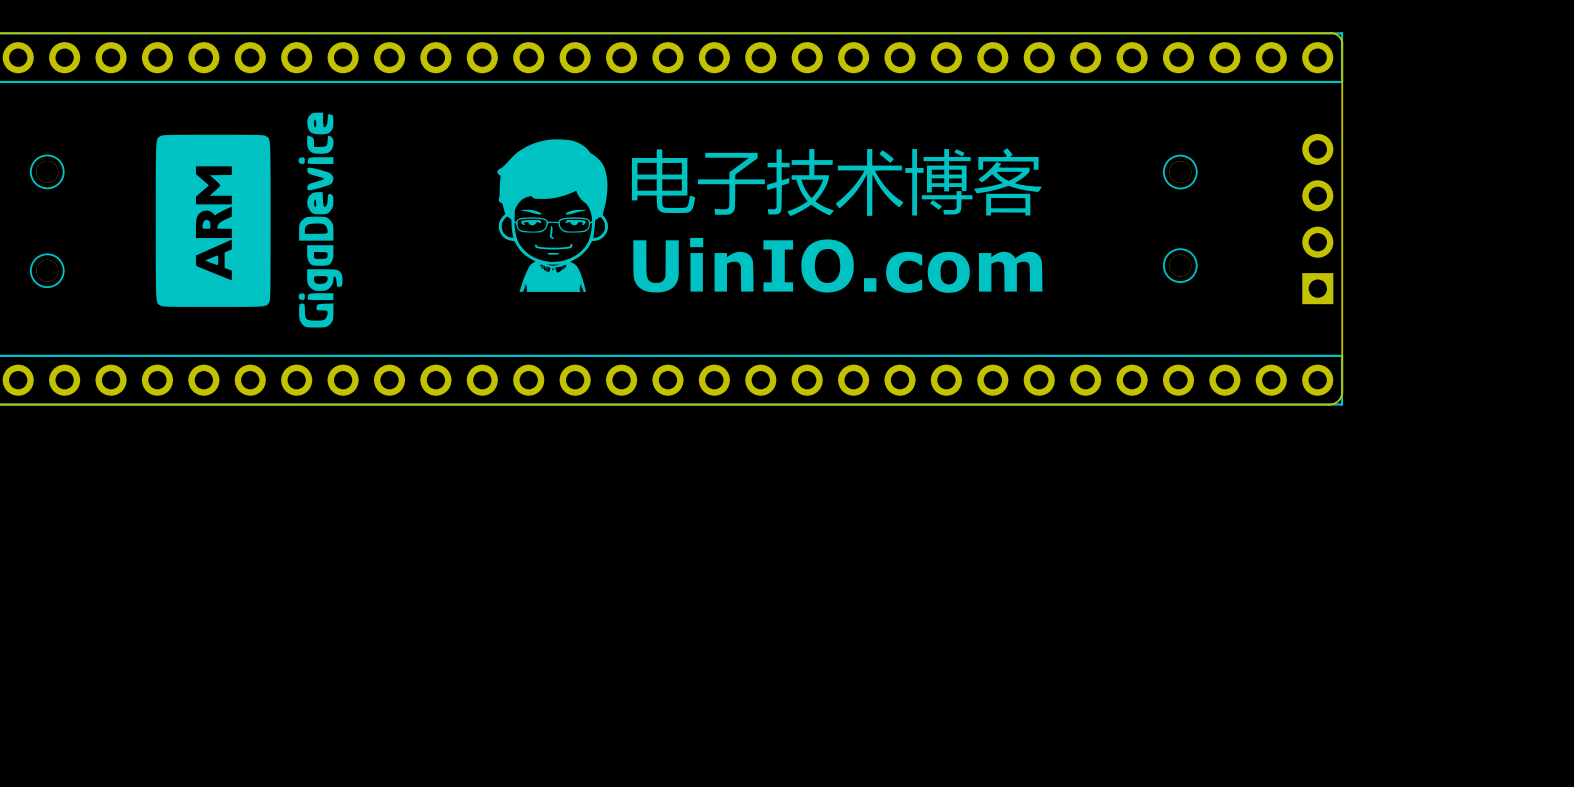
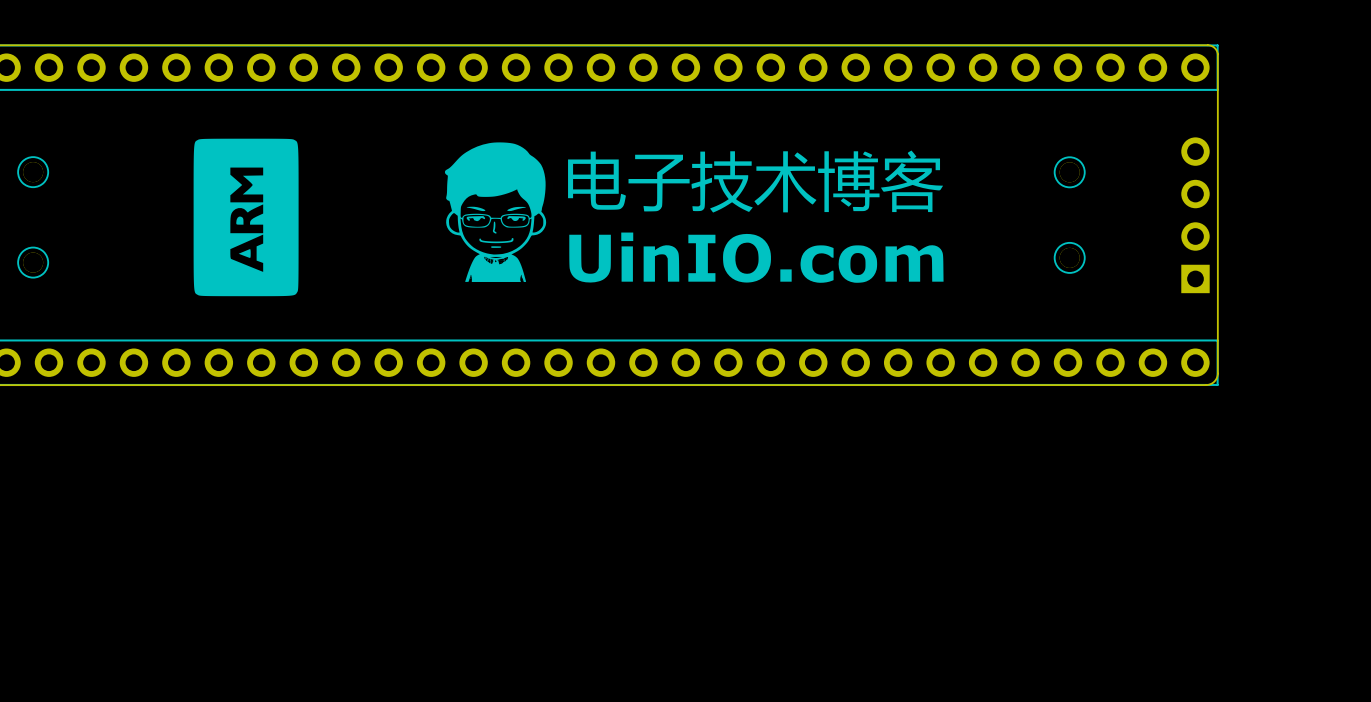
drawing: [298, 112, 343, 328] -> none
drawing position: (213, 220) -> (246, 217)

